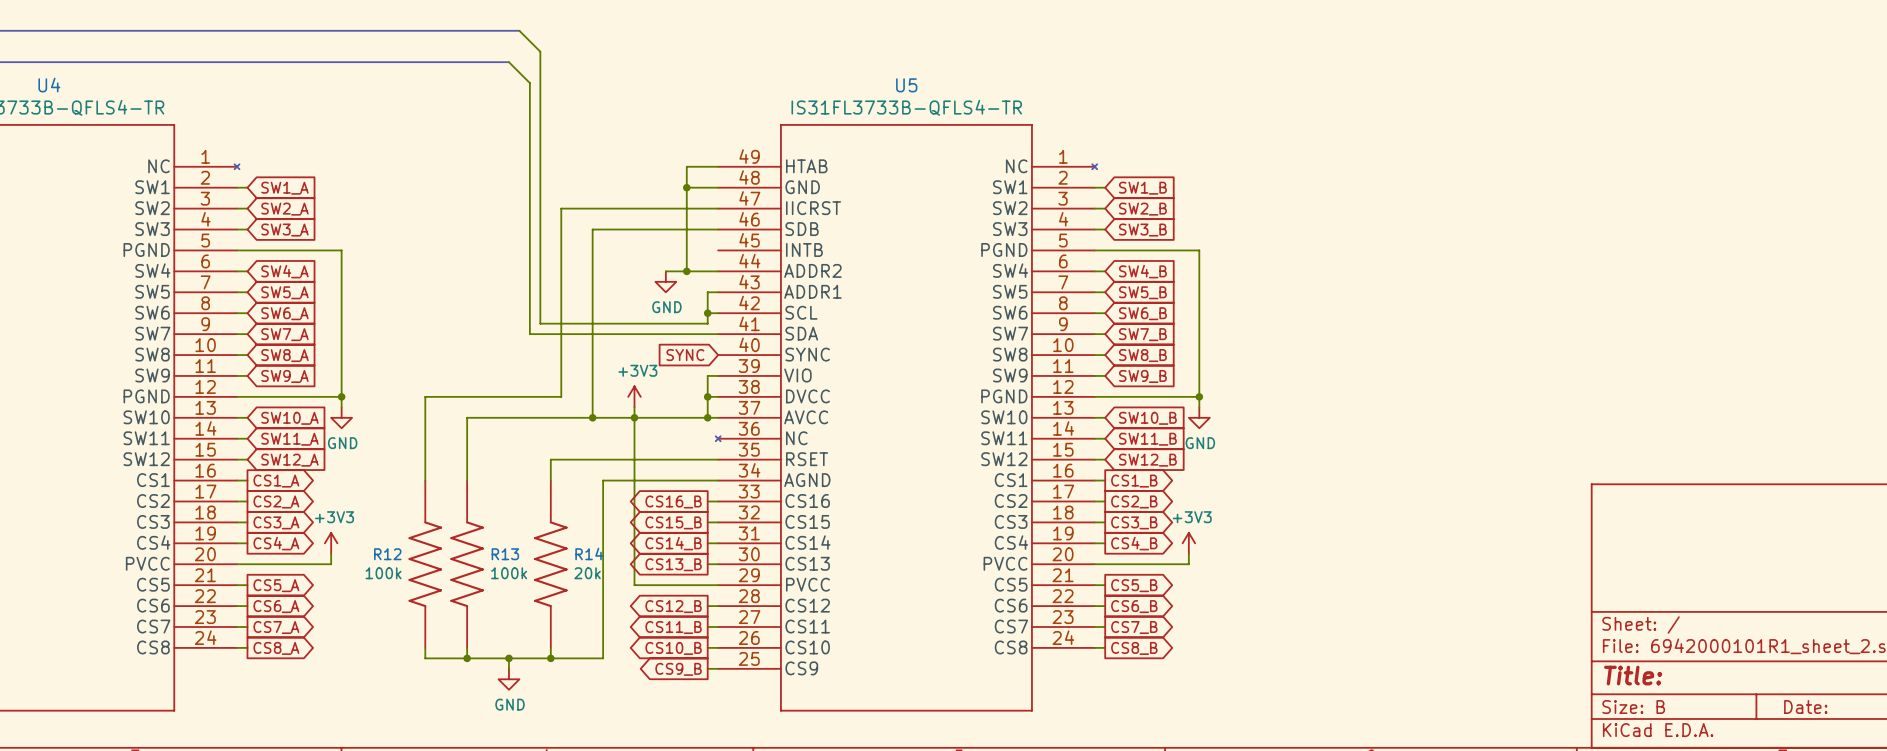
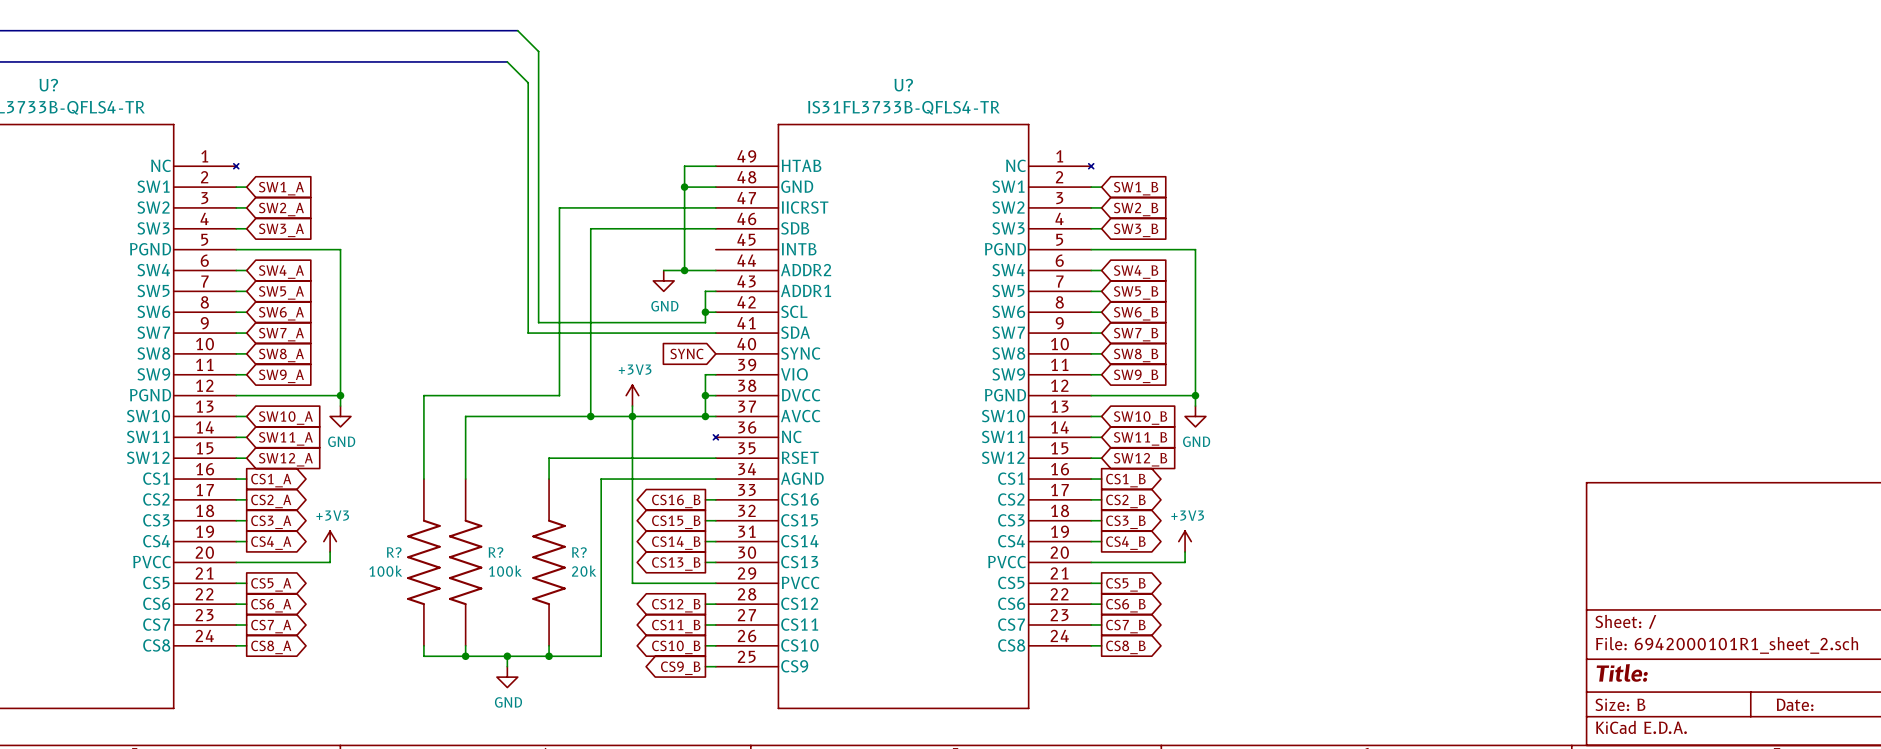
U4 name: U4 (49, 85) -> U? (48, 85)
U5 name: U5 (906, 85) -> U? (903, 85)
R14 name: R14 (589, 553) -> R? (579, 552)
R12 name: R12 (387, 554) -> R? (394, 552)
R13 name: R13 (505, 554) -> R? (495, 552)

